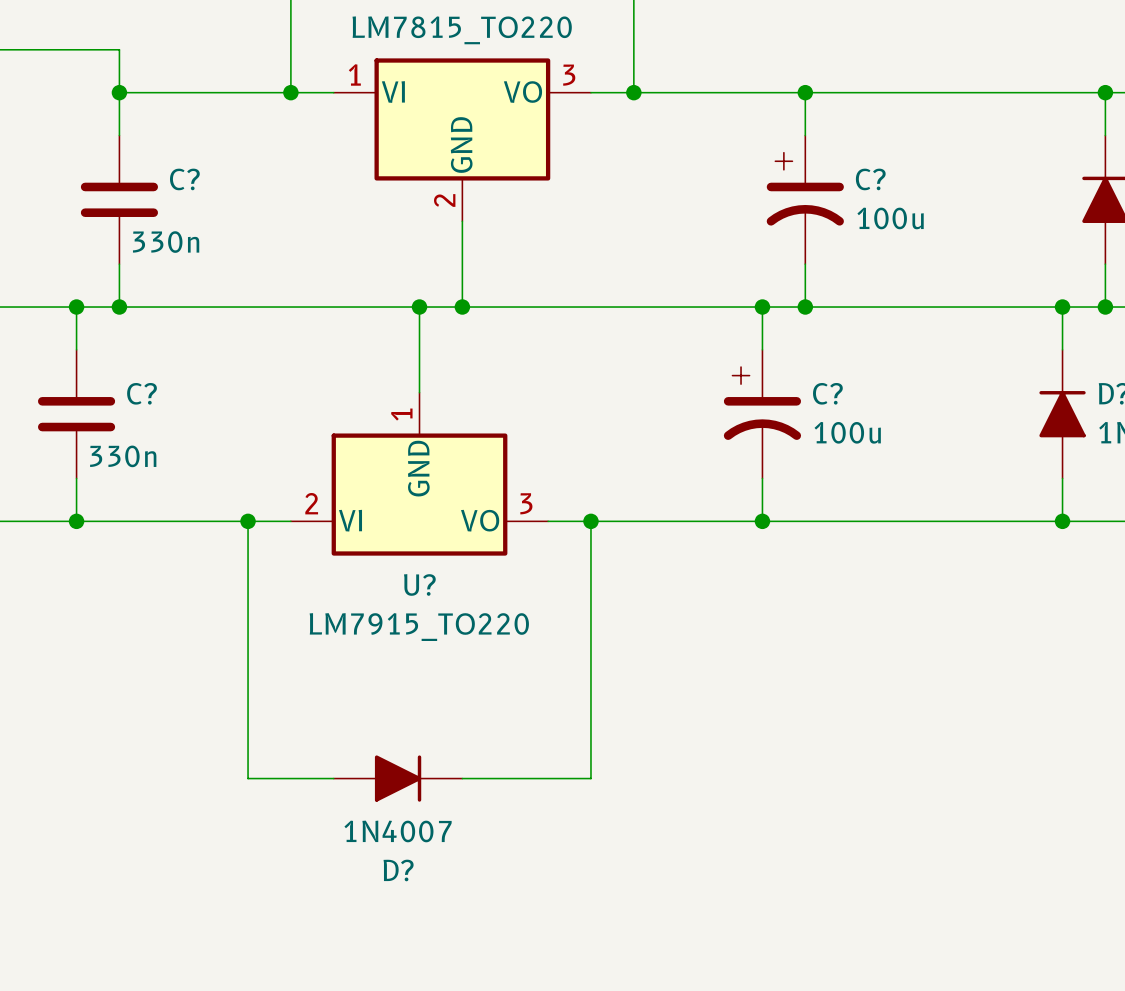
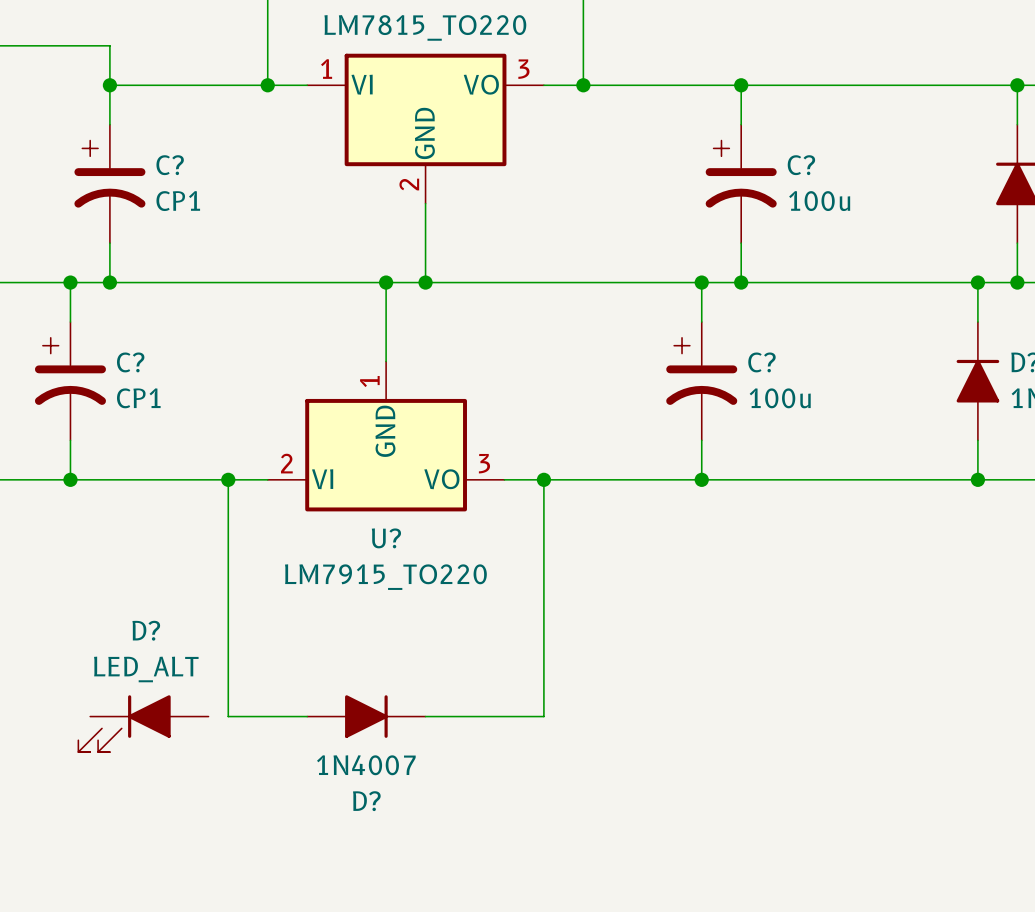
C? symbol: [80, 135, 159, 265] -> [74, 124, 146, 244]
C? value: 330n (166, 242) -> CP1 (178, 201)
C? symbol: [37, 349, 116, 479] -> [34, 322, 106, 441]
C? value: 330n (123, 456) -> CP1 (138, 398)
D?: none -> LED_ALT (143, 723)

